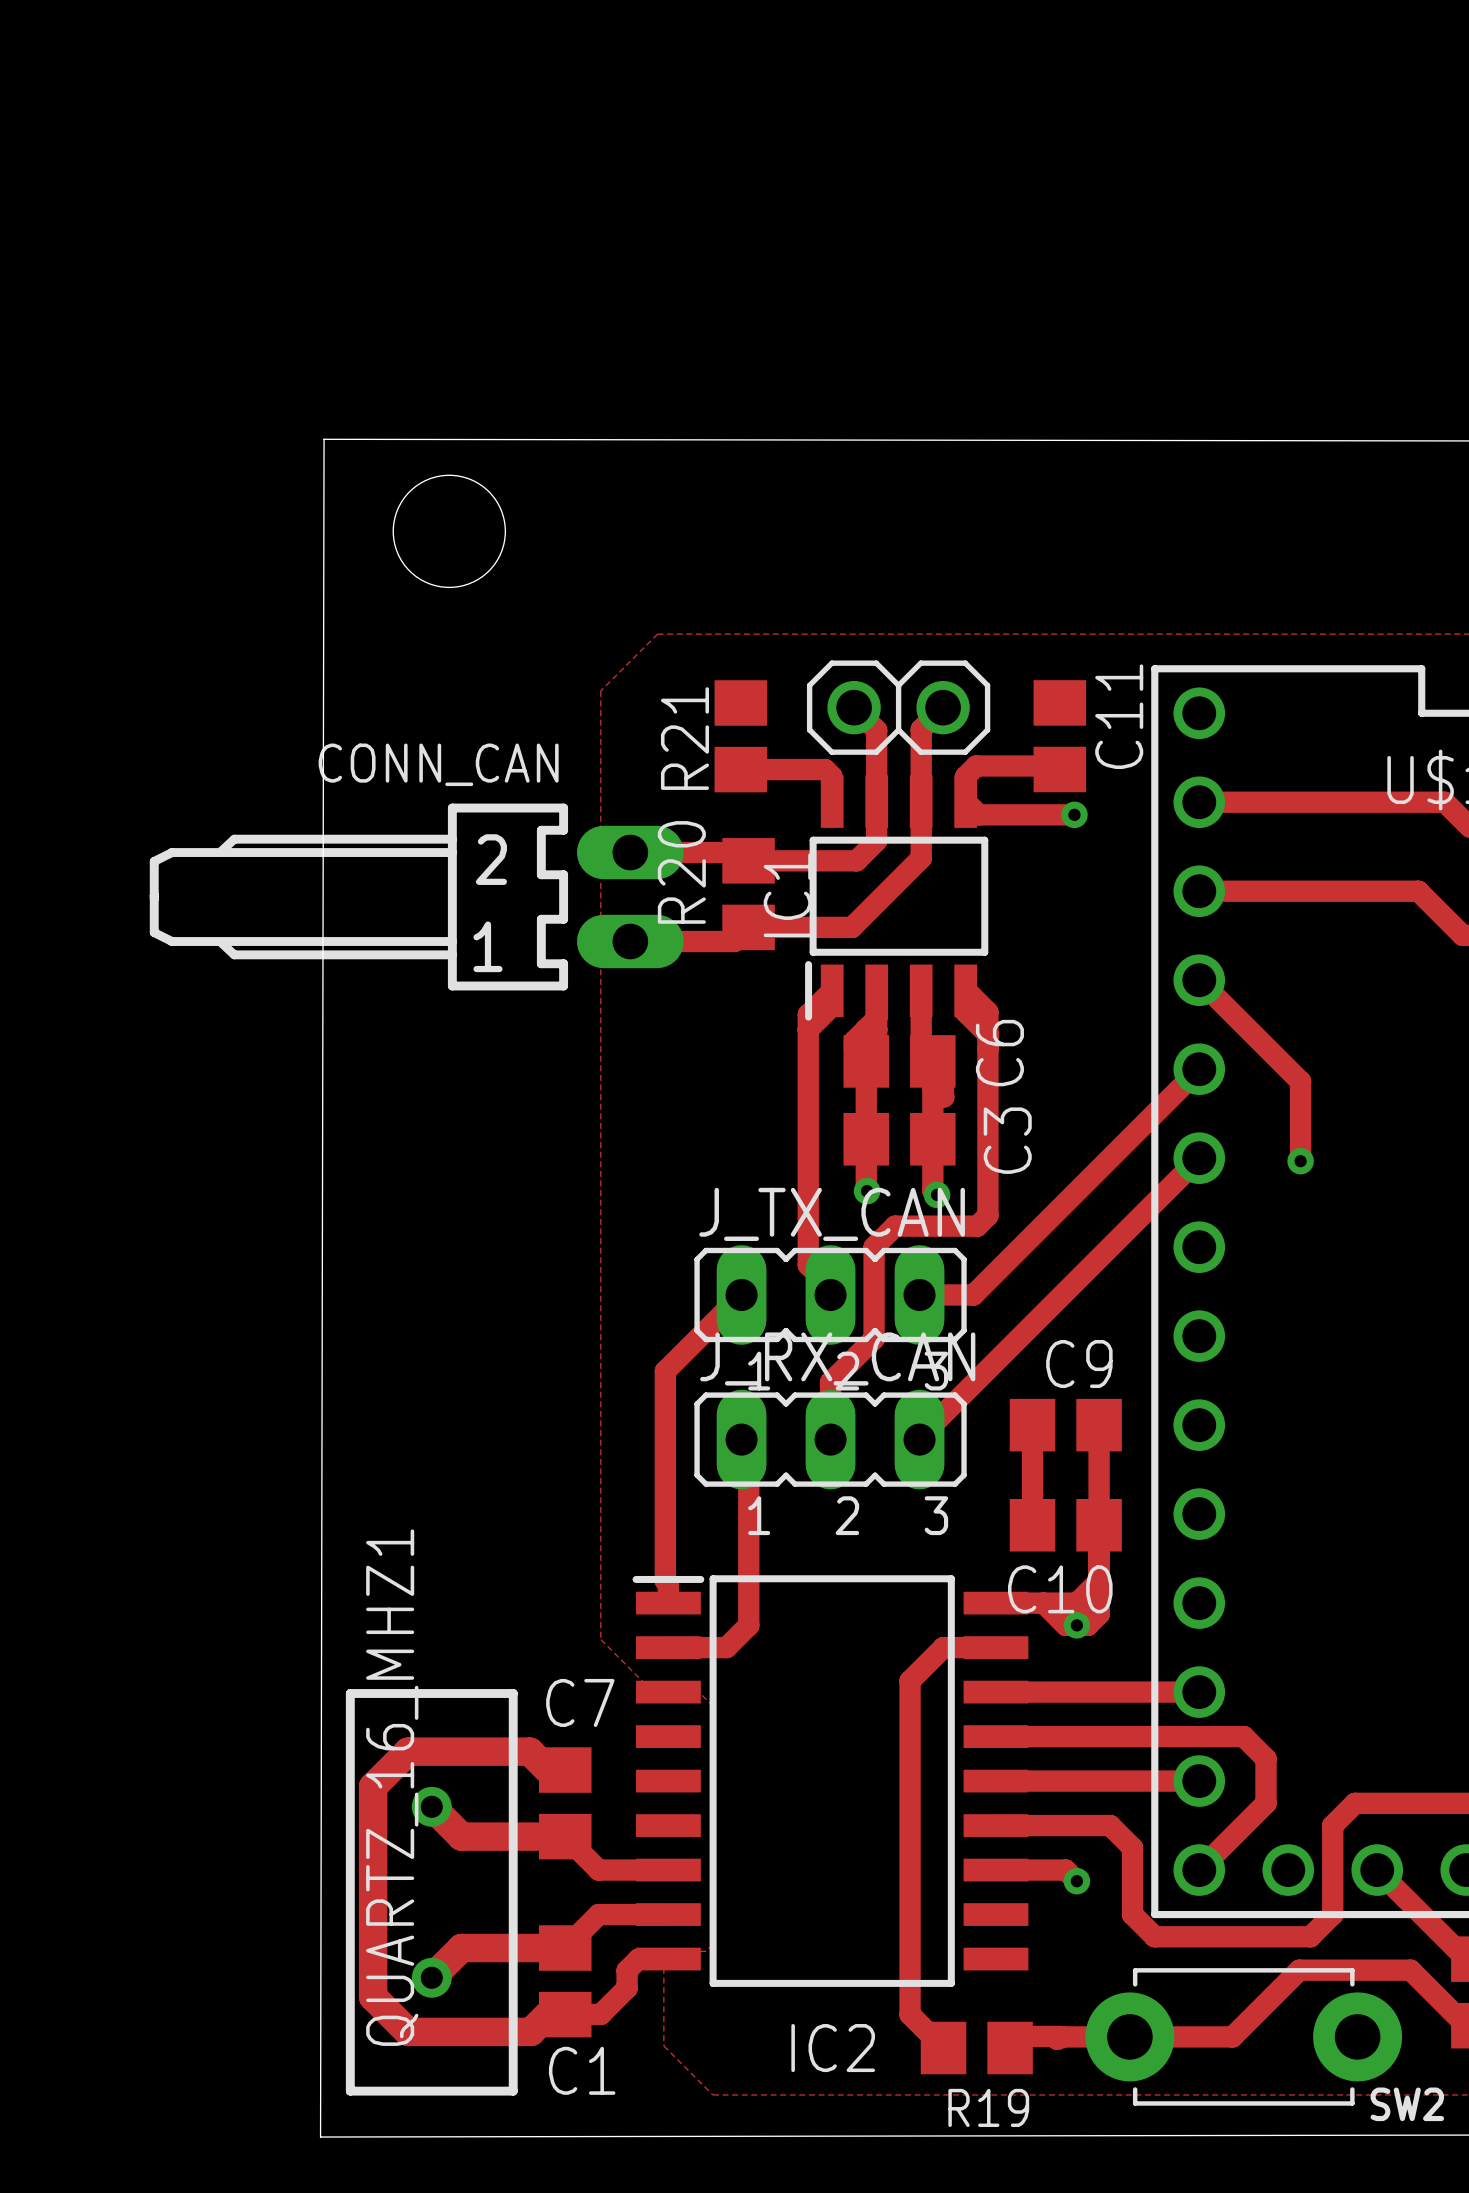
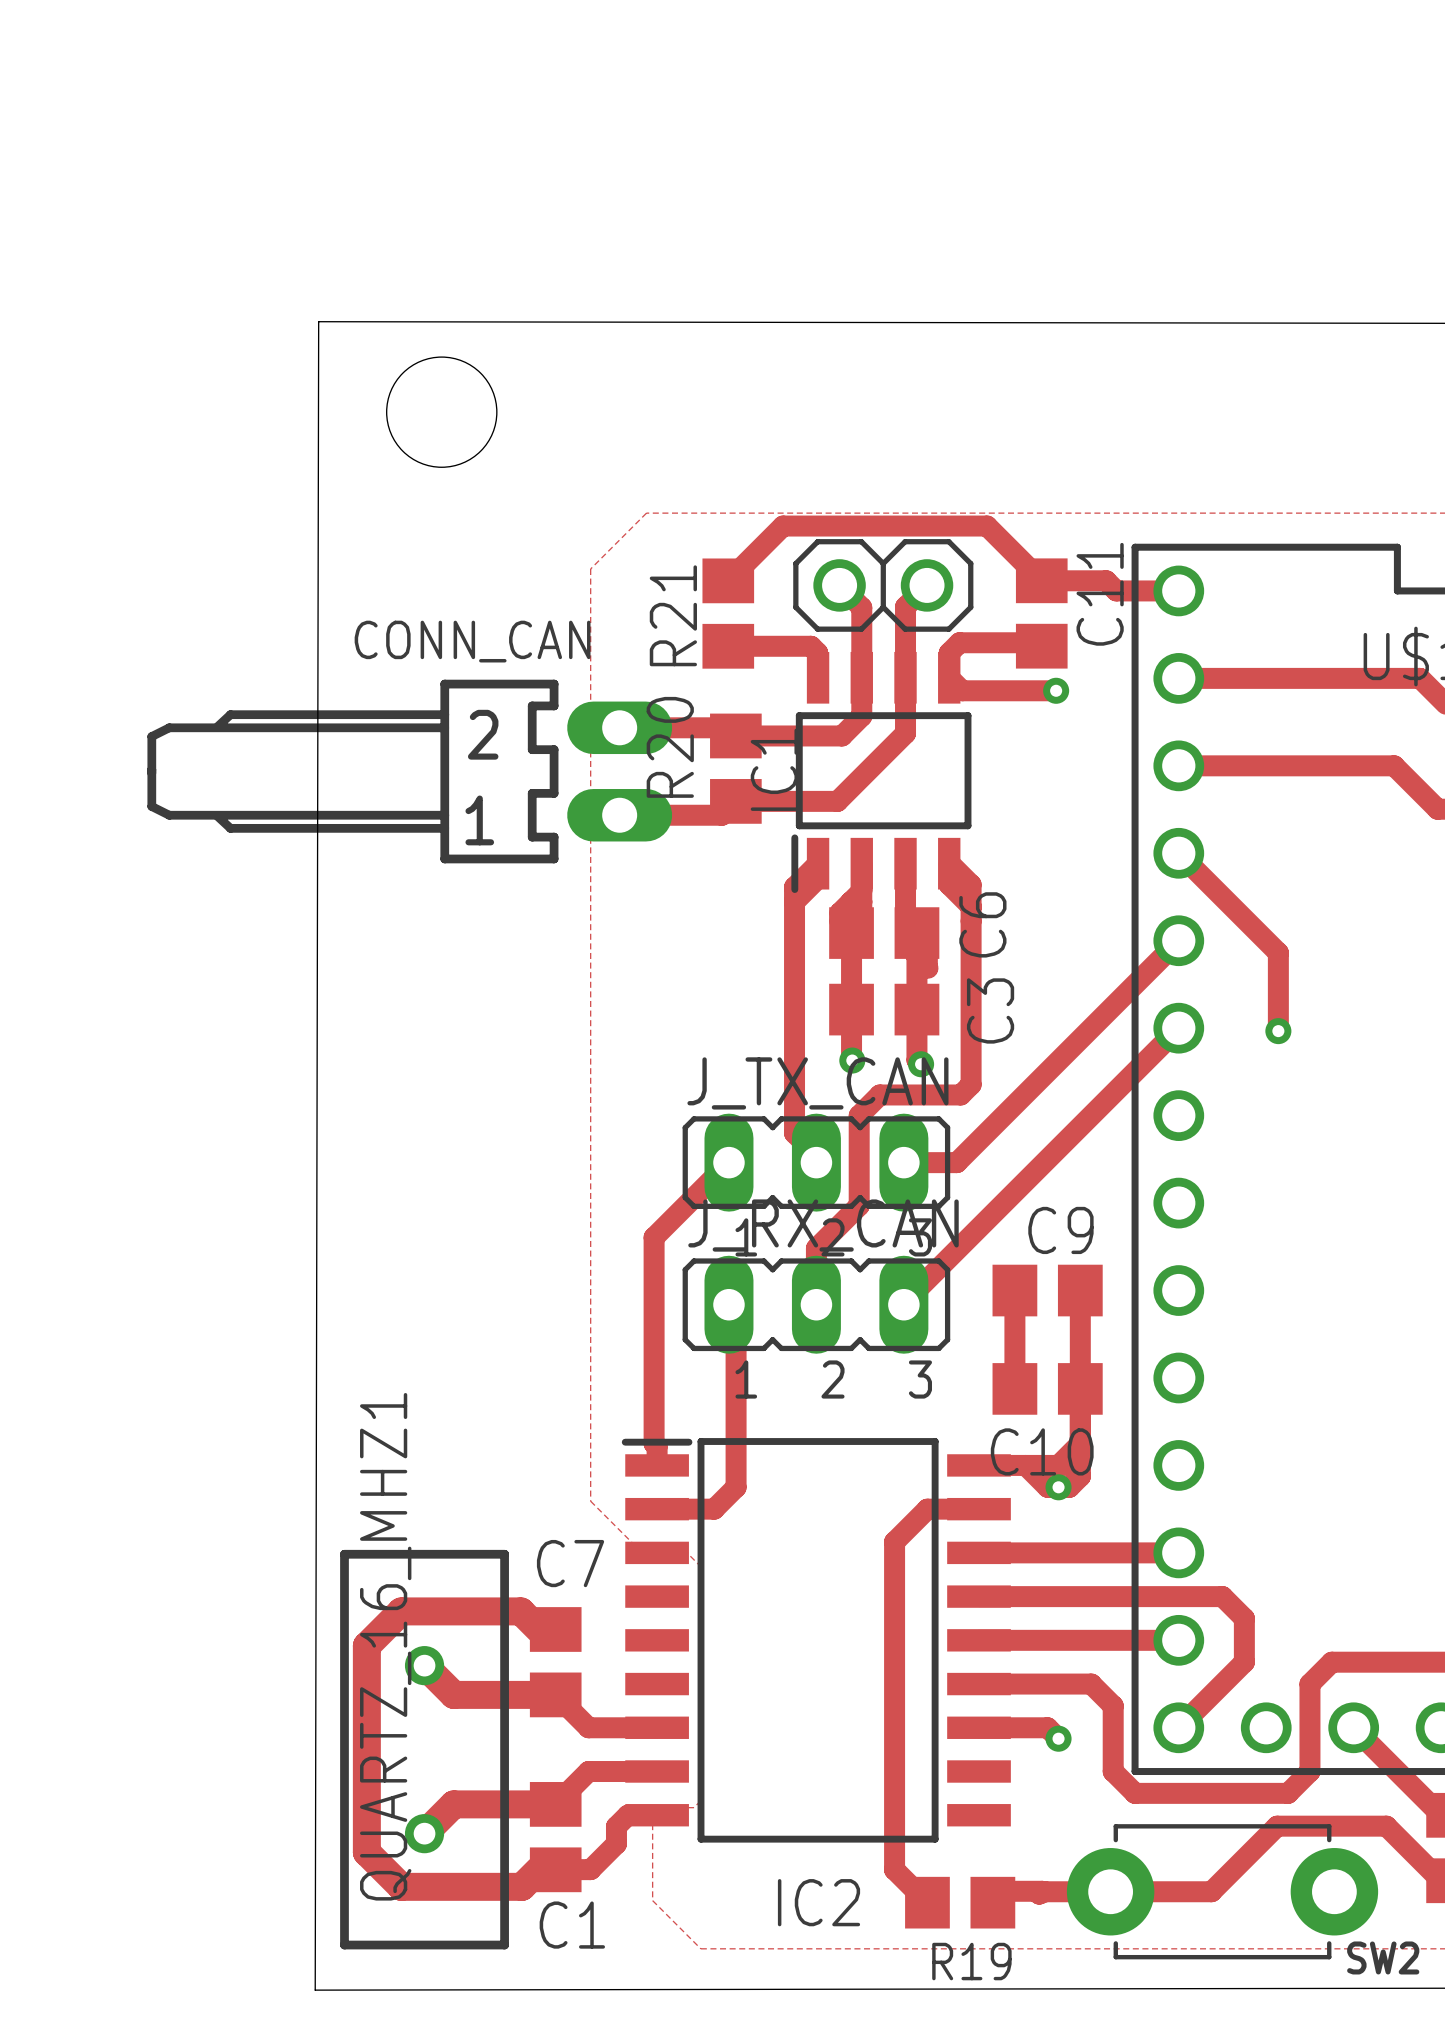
track: none -> (1028, 580) (1106, 580) (1116, 590) (1178, 590)
track: none -> (1041, 580) (987, 526) (783, 526) (728, 580)
CONN_CAN name position: CONN_CAN (438, 764) -> CONN_CAN (472, 641)

